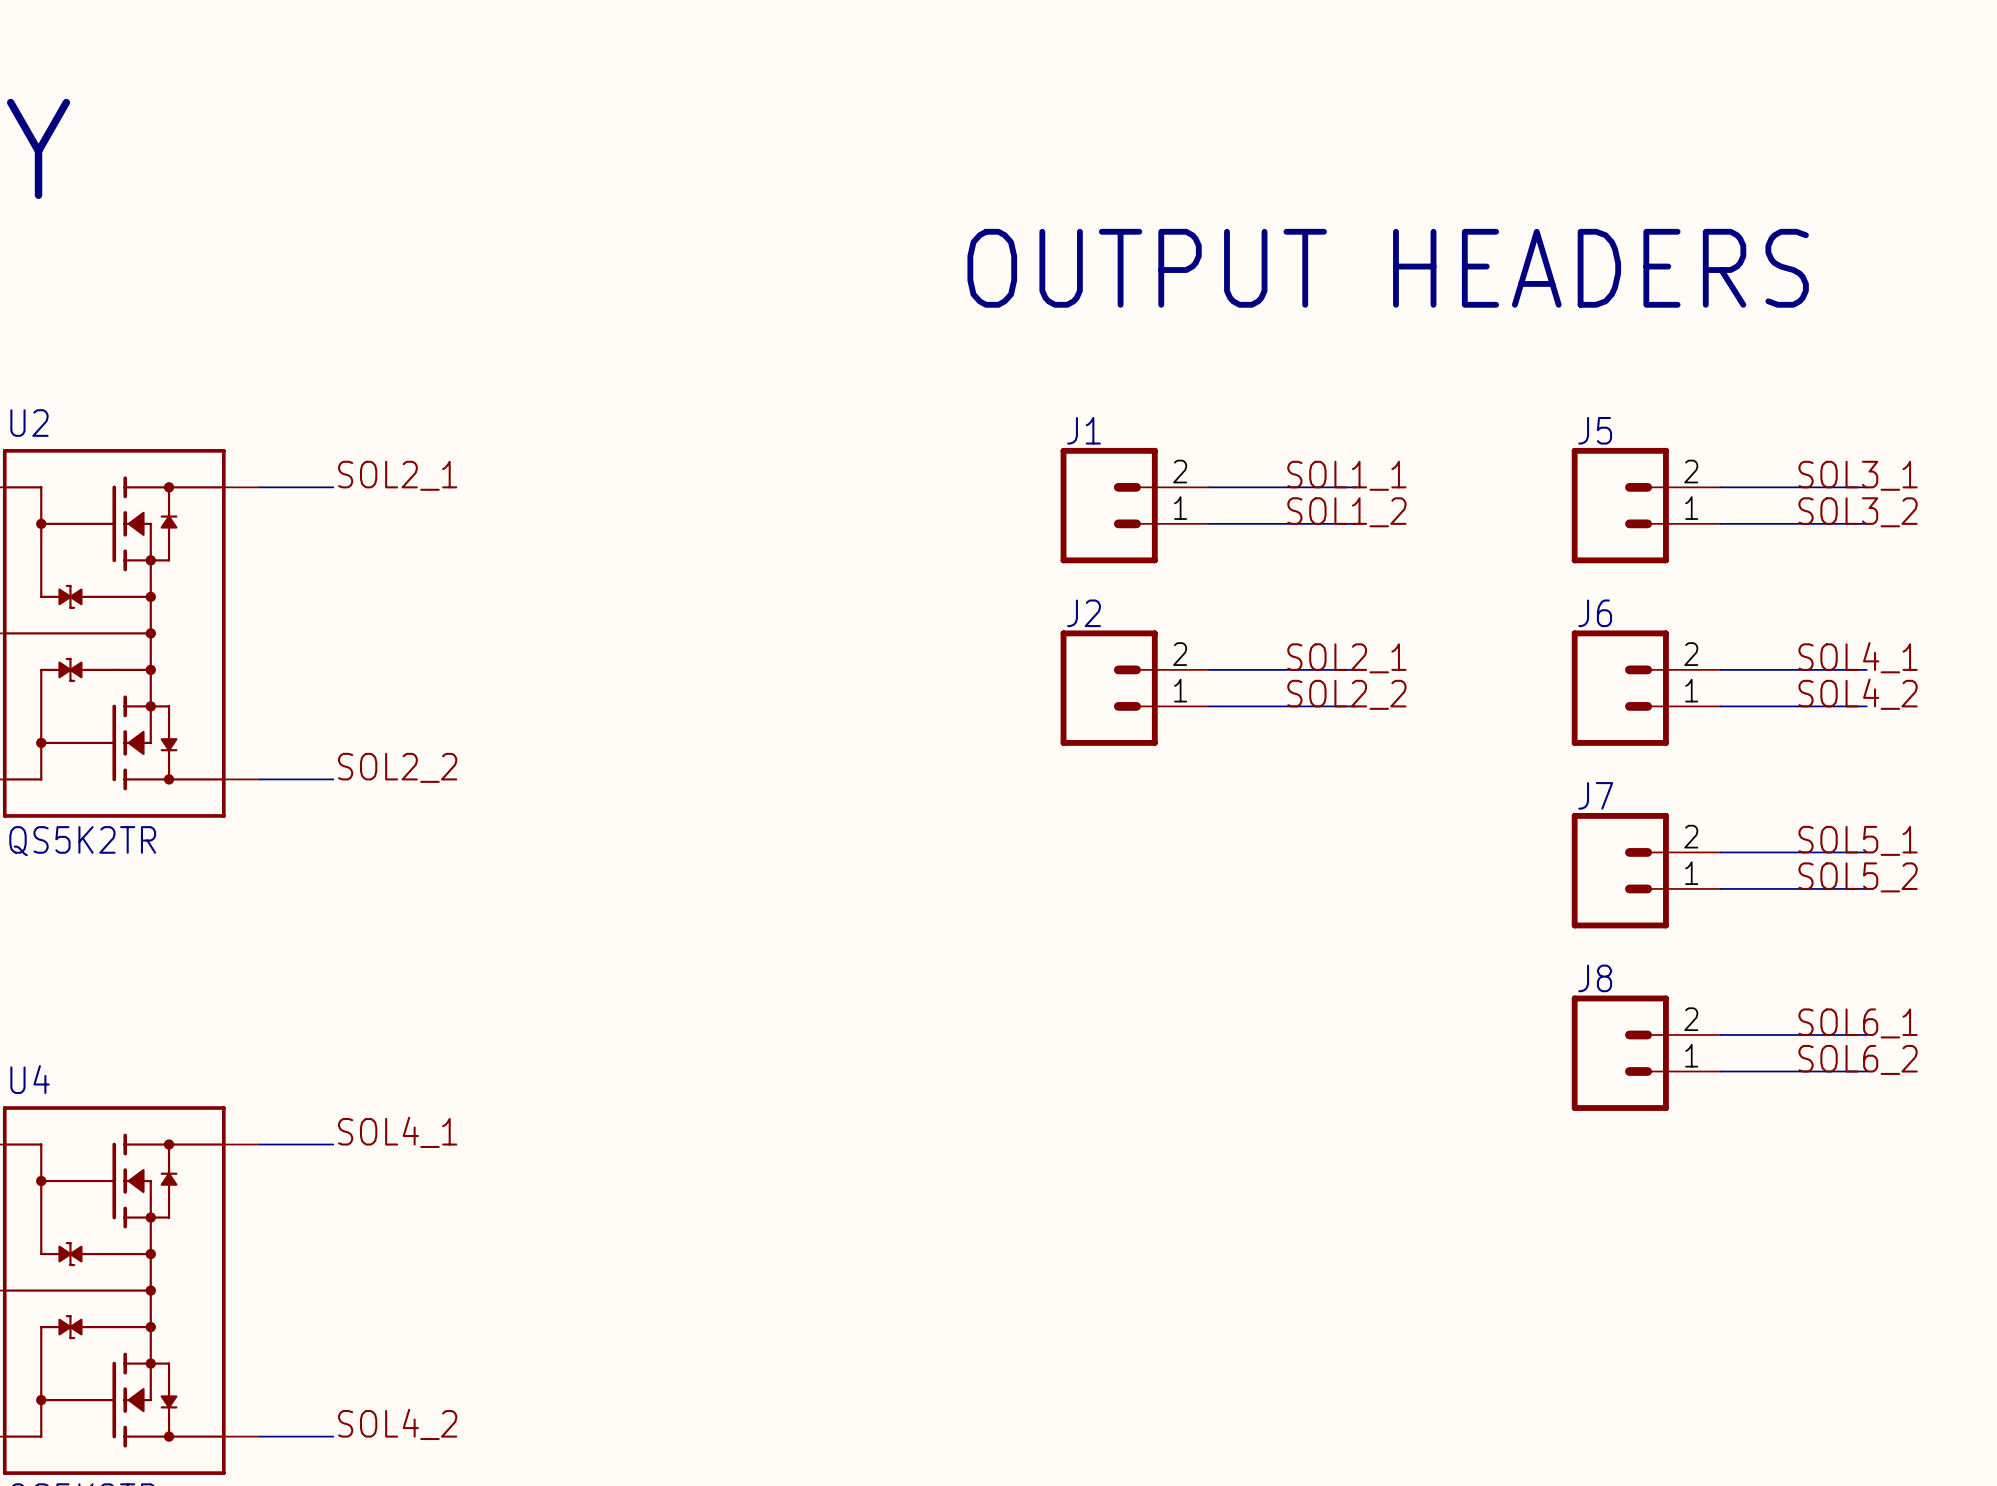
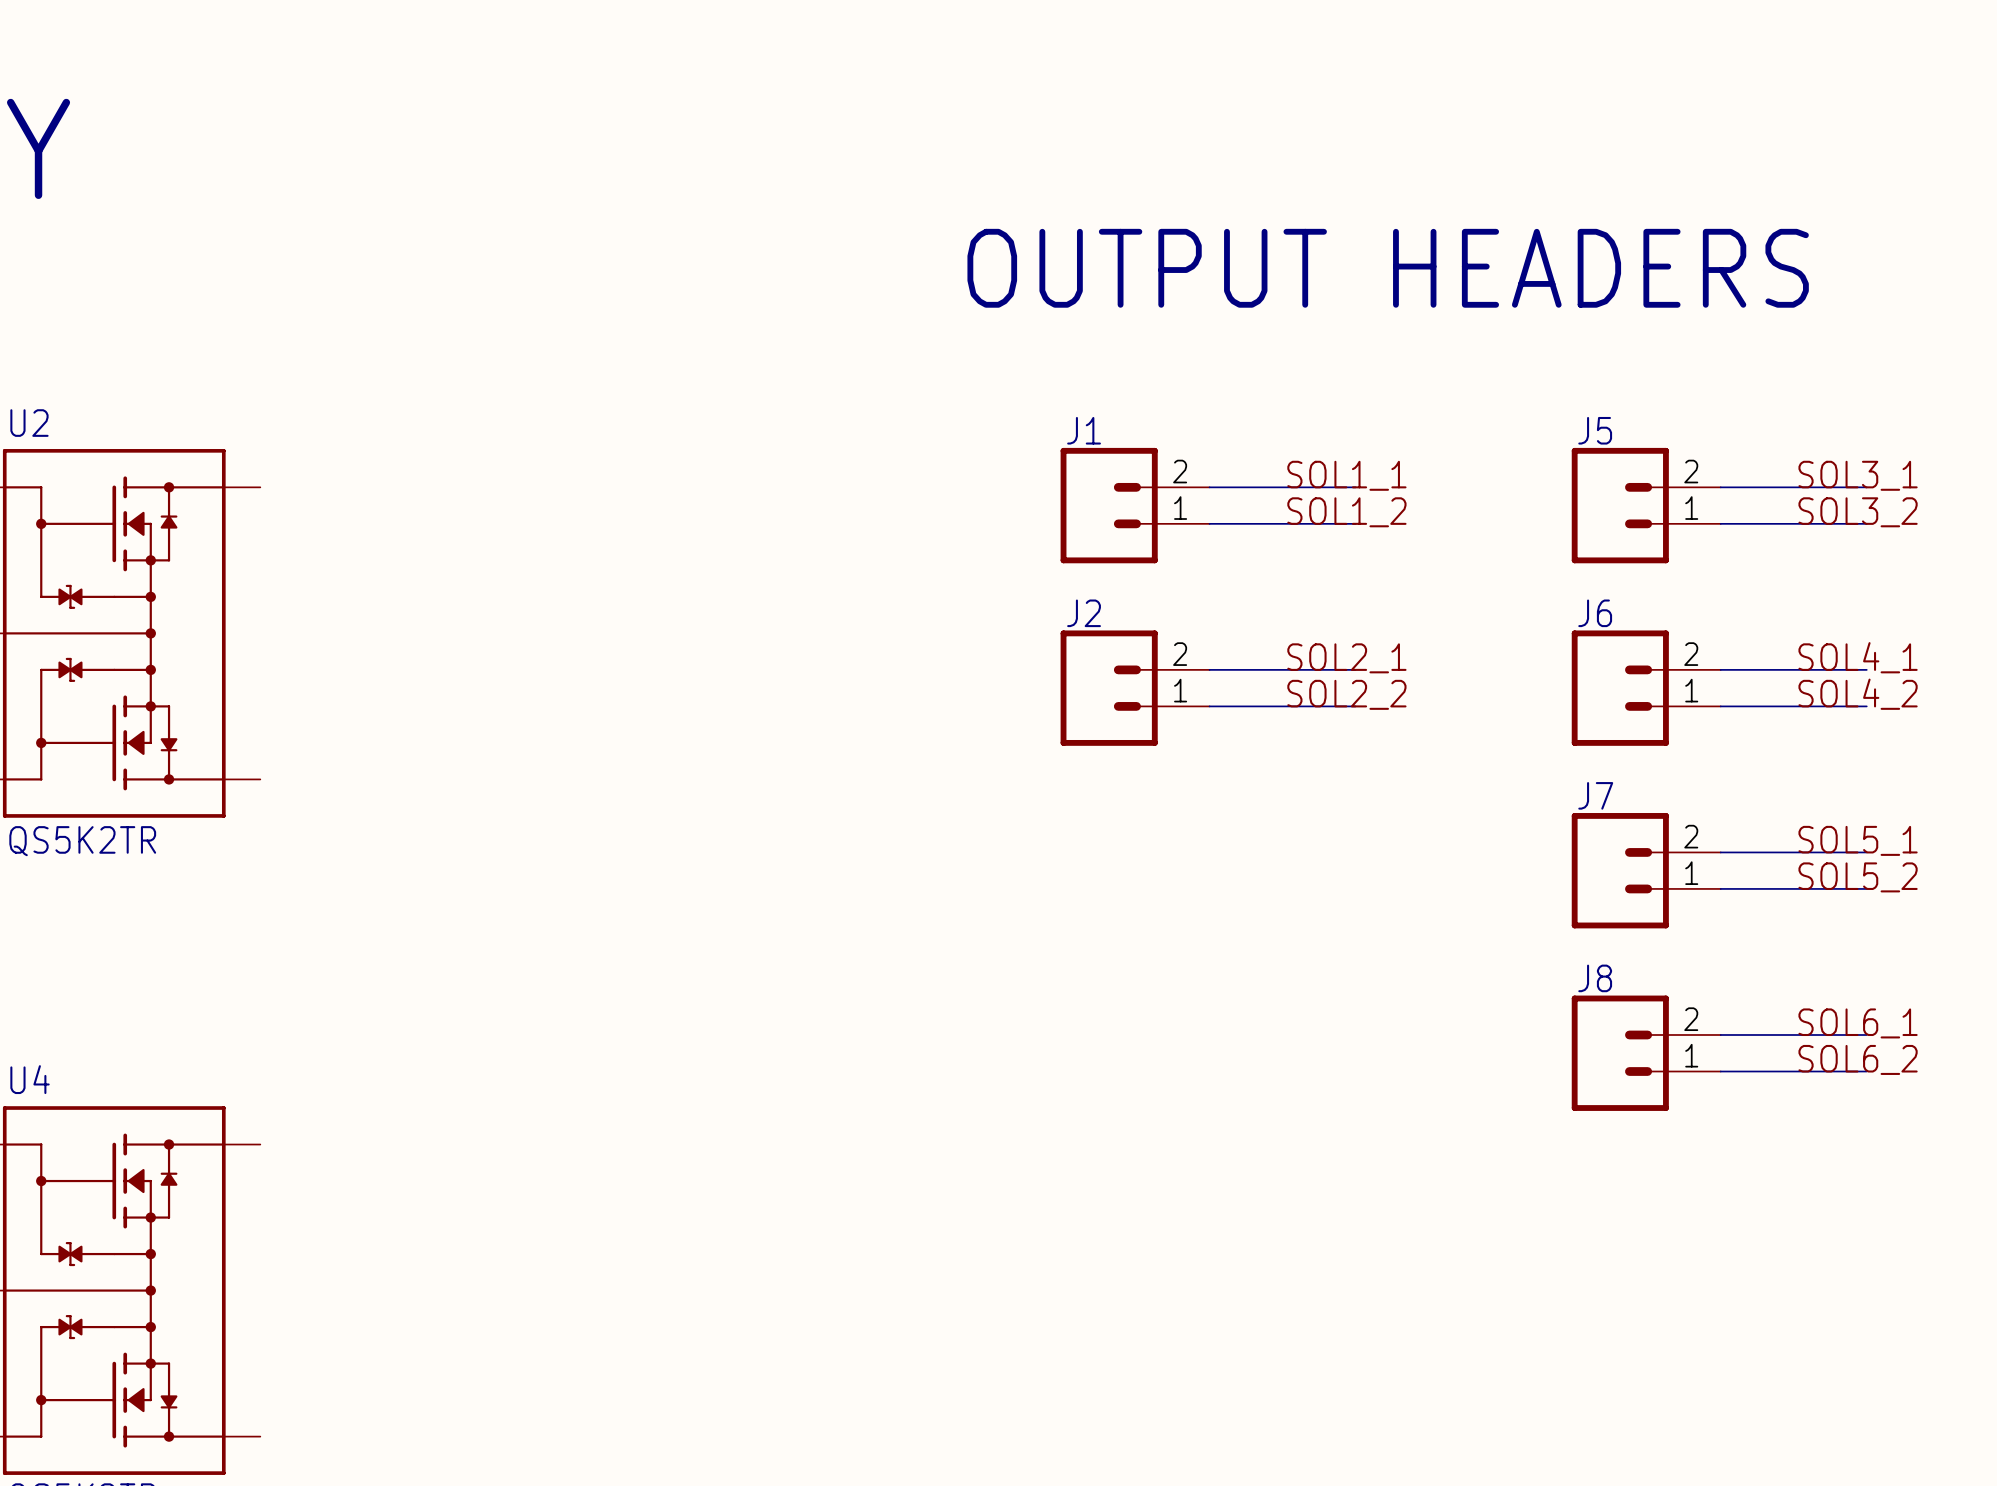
label: SOL2_1 (397, 475) -> none
wire: (260, 487) (333, 487) -> none
label: SOL2_2 (397, 767) -> none
wire: (260, 779) (333, 779) -> none
label: SOL4_1 (397, 1132) -> none
wire: (260, 1144) (333, 1144) -> none
label: SOL4_2 (397, 1424) -> none
wire: (260, 1436) (333, 1436) -> none

